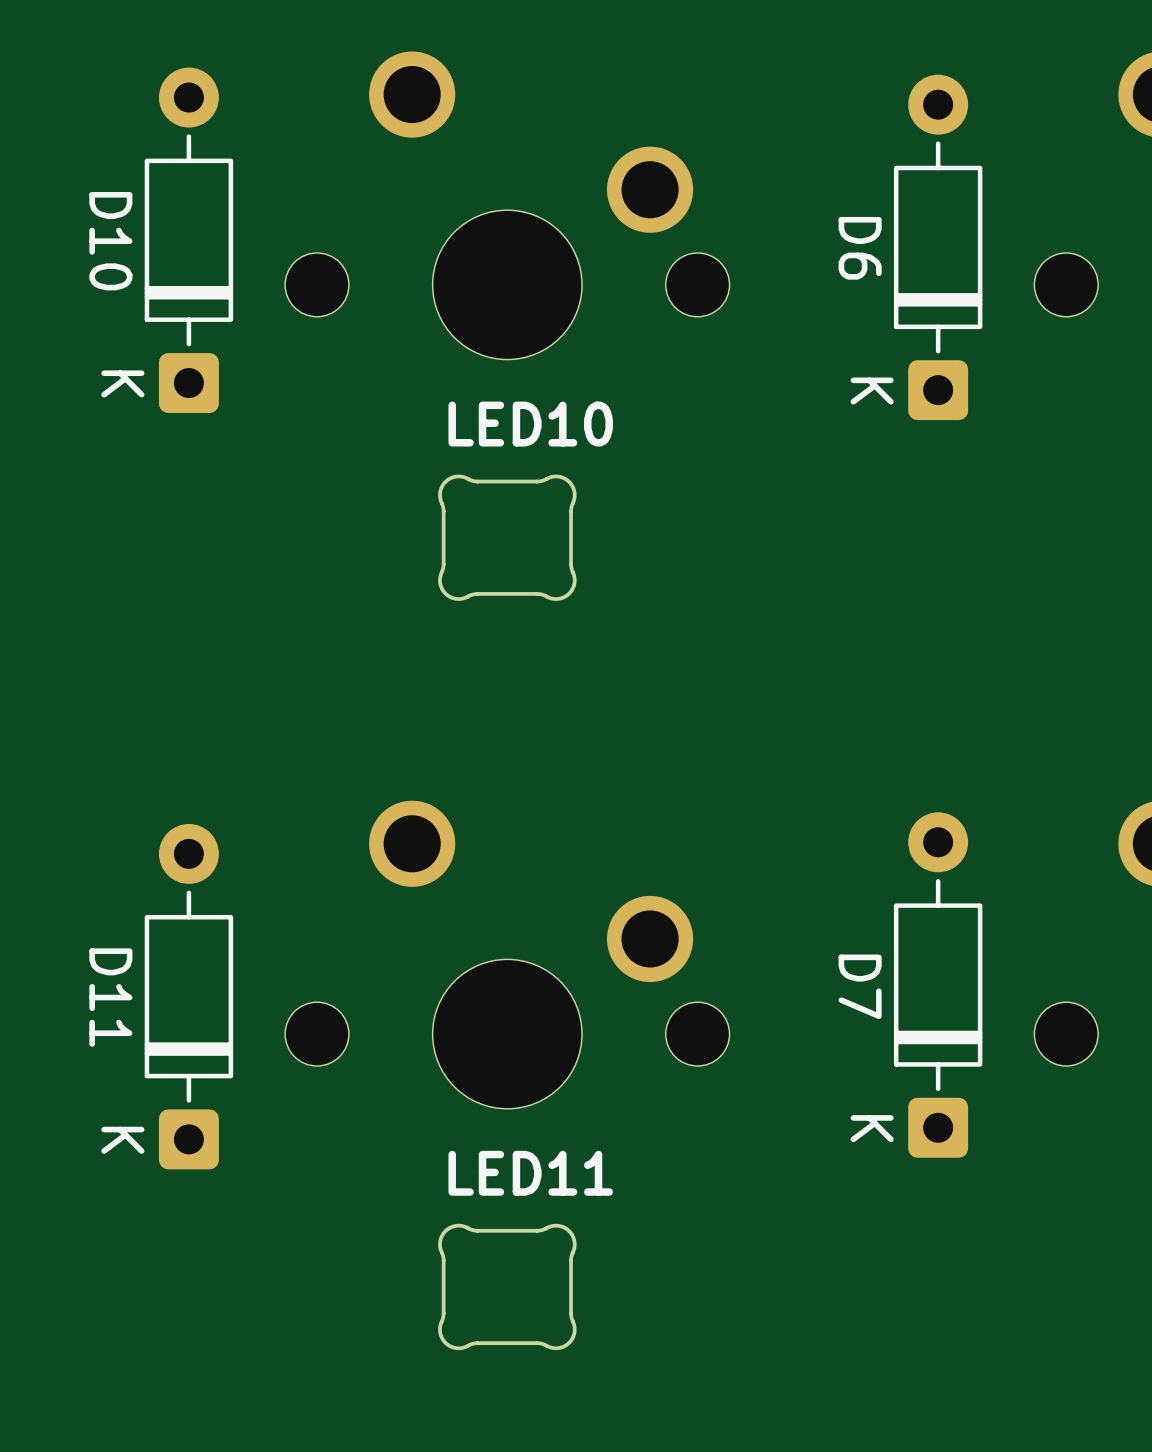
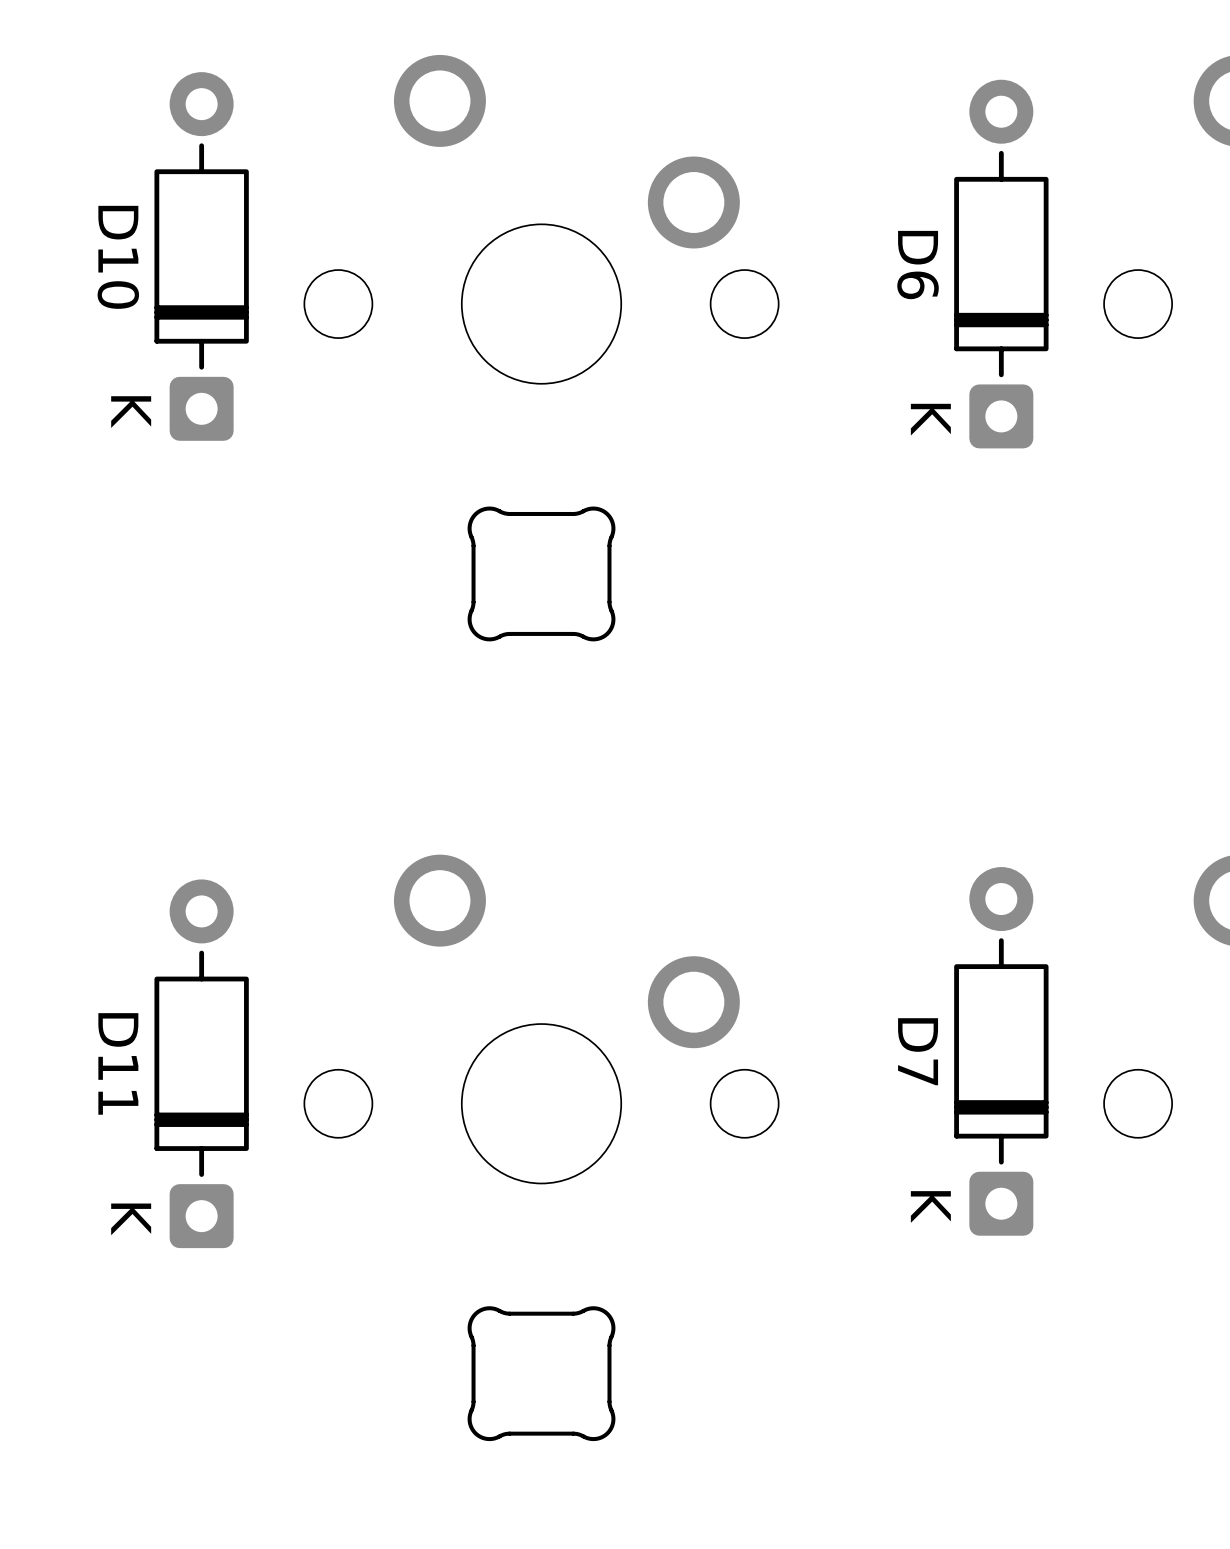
LED10 name: LED10 (530, 424) -> none
LED11 name: LED11 (530, 1173) -> none

